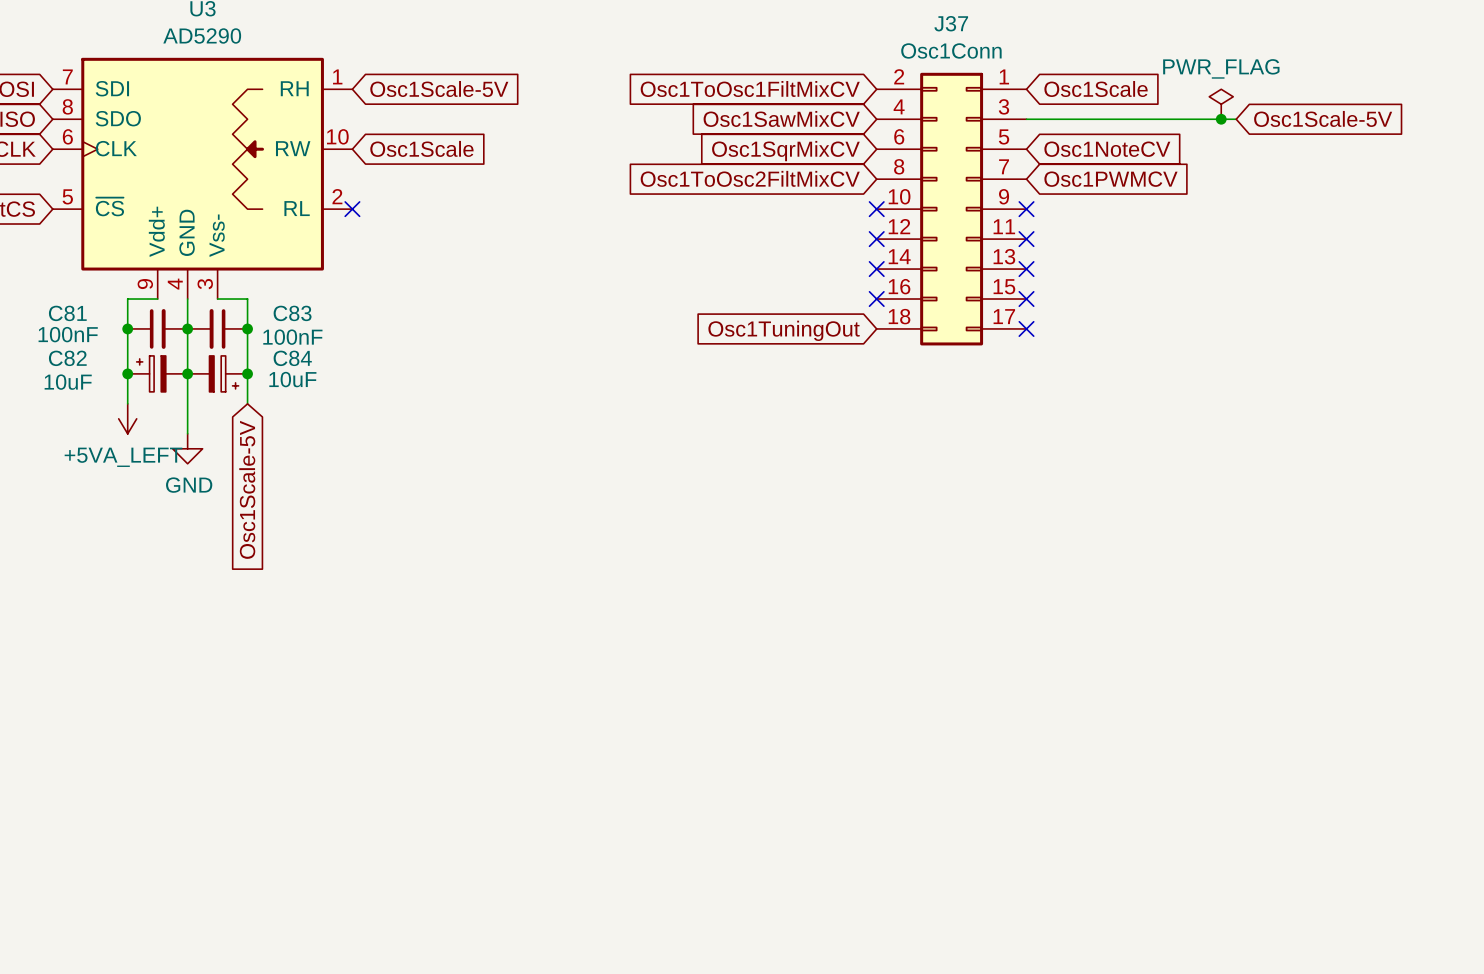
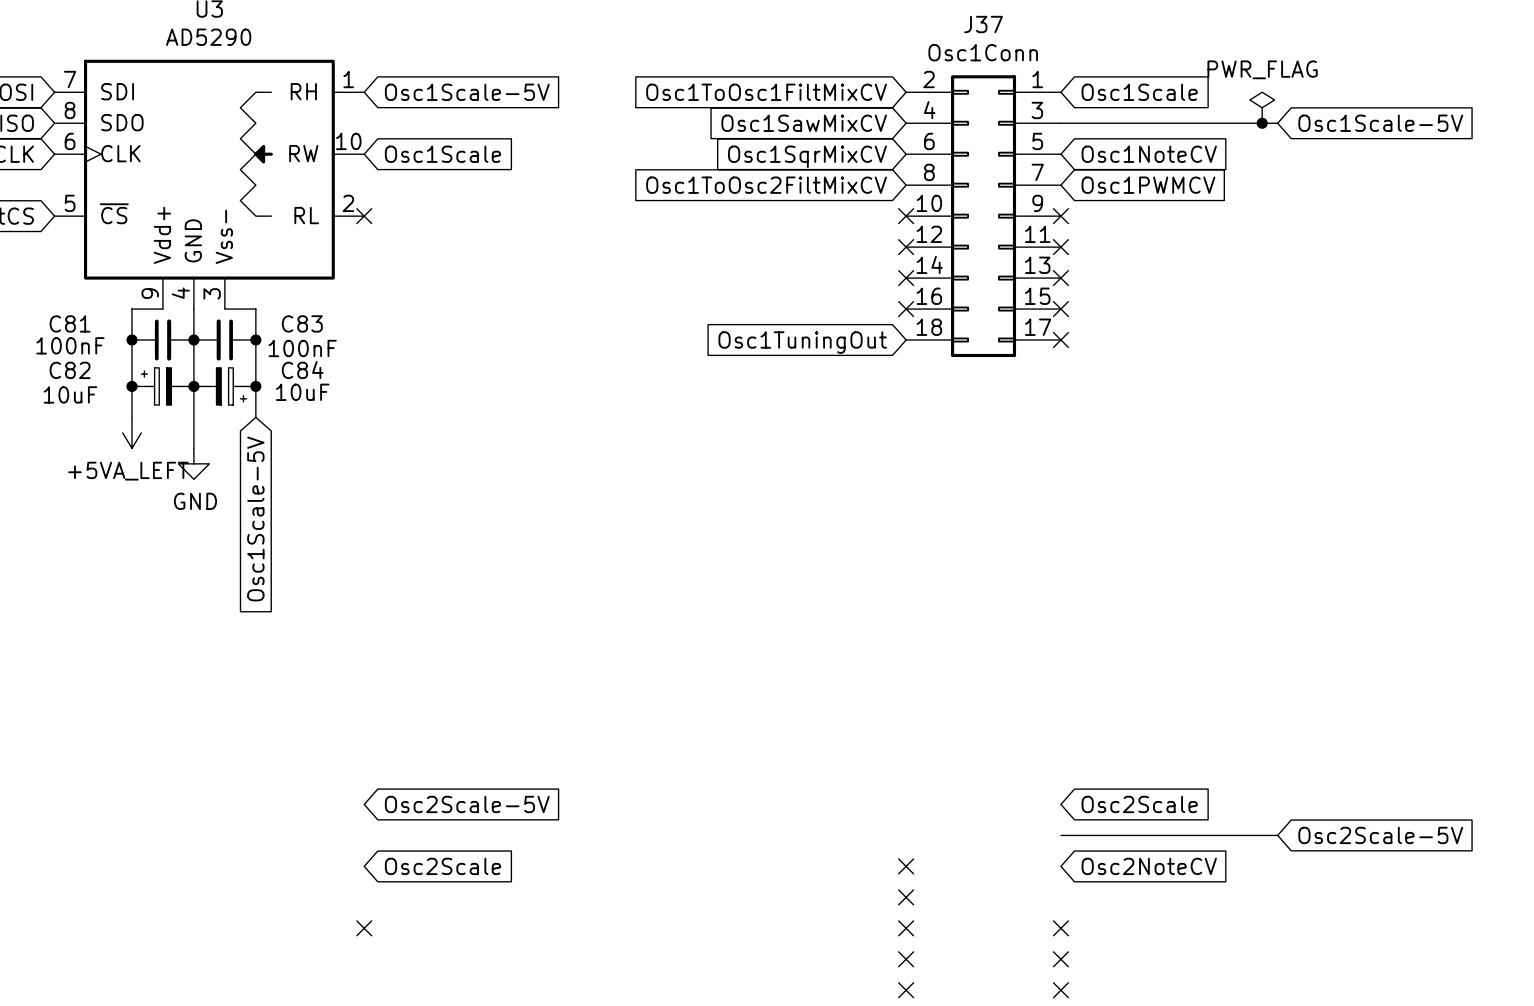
global label: none -> Osc2Scale-5V (467, 804)
global label: none -> Osc2Scale (1139, 804)
wire: none -> (1060, 835) (1277, 835)
global label: none -> Osc2Scale-5V (1380, 835)
global label: none -> Osc2Scale (442, 866)
no-connect mark: none -> (906, 866)
global label: none -> Osc2NoteCV (1149, 866)
no-connect mark: none -> (906, 897)
no-connect mark: none -> (364, 928)
no-connect mark: none -> (906, 928)
no-connect mark: none -> (1060, 928)
no-connect mark: none -> (906, 959)
no-connect mark: none -> (1060, 959)
no-connect mark: none -> (906, 990)
no-connect mark: none -> (1060, 990)

